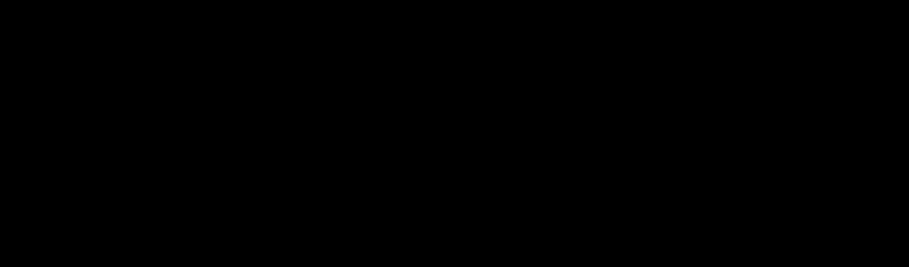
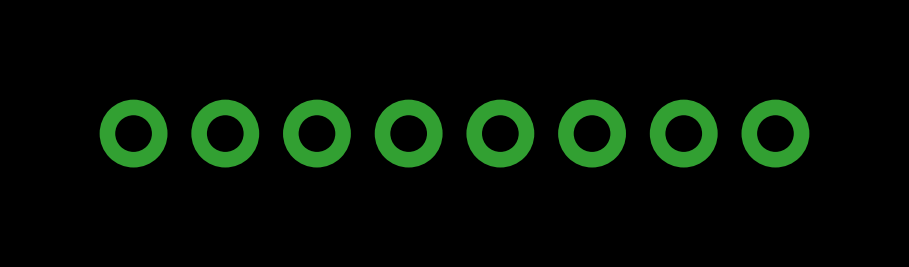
part: none -> (454, 133)

